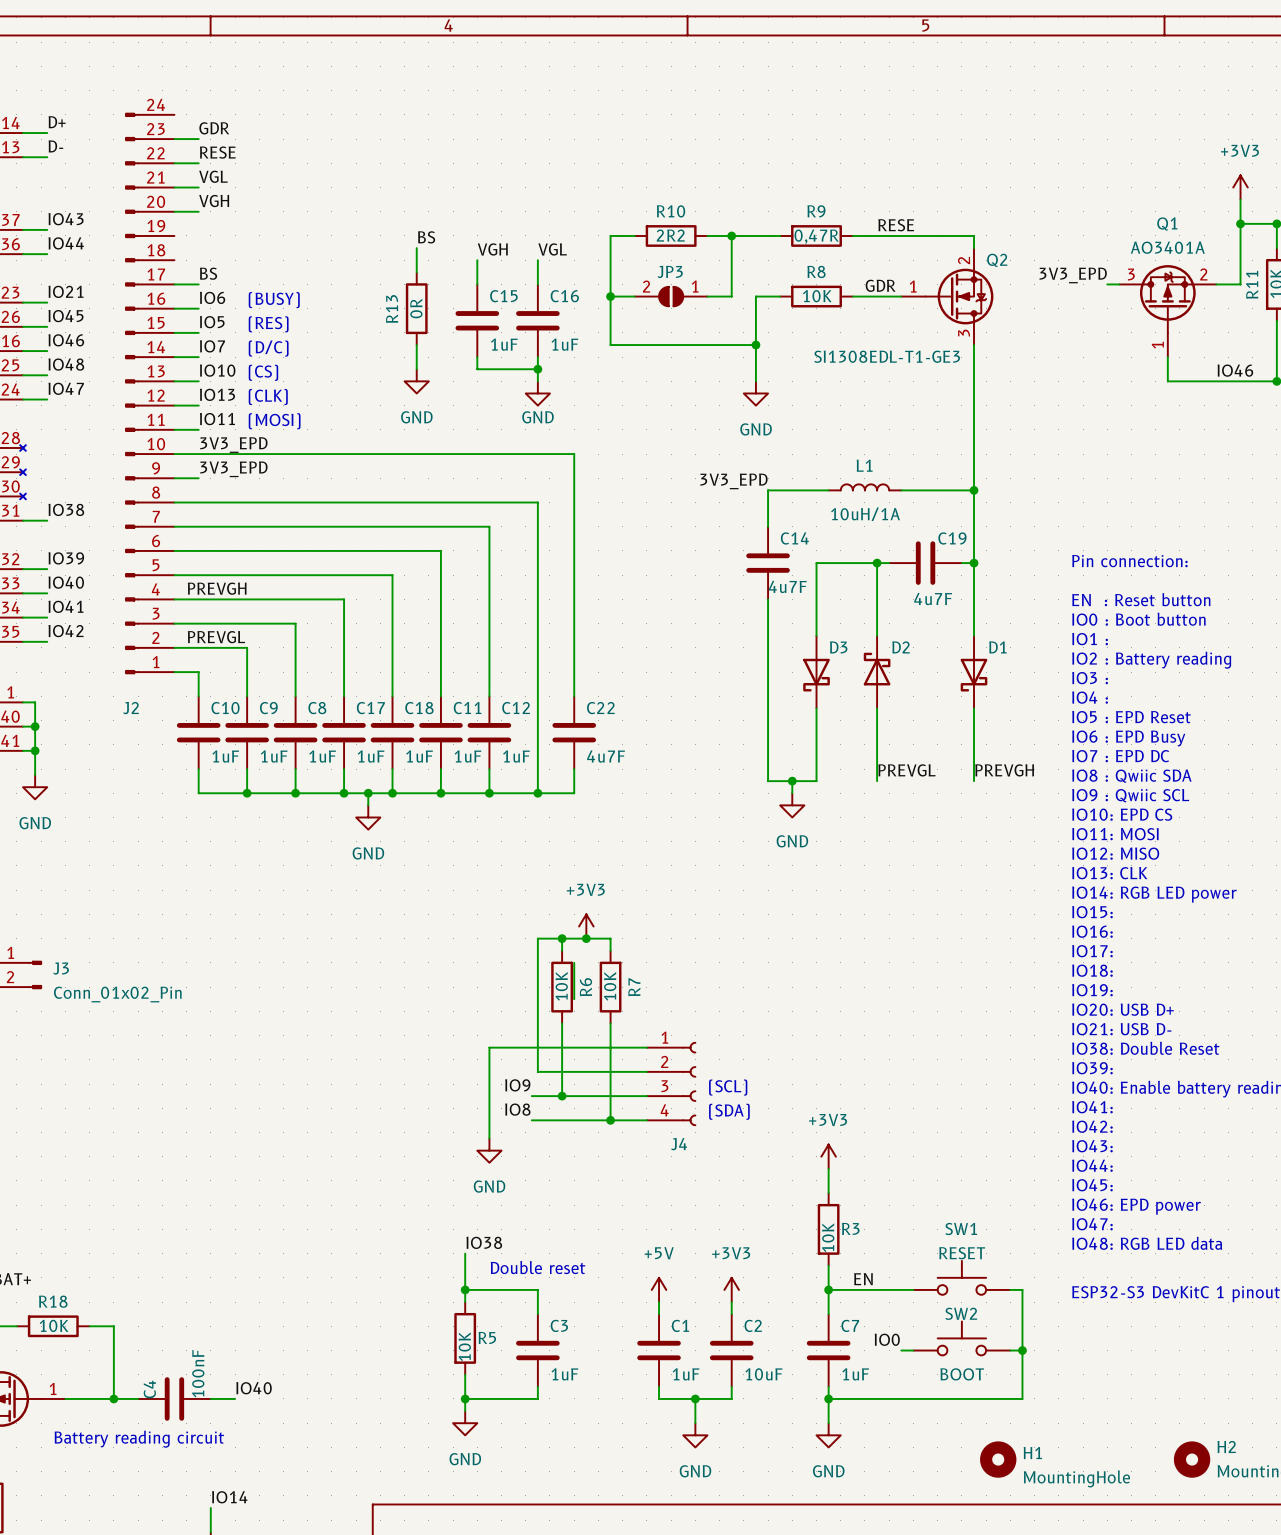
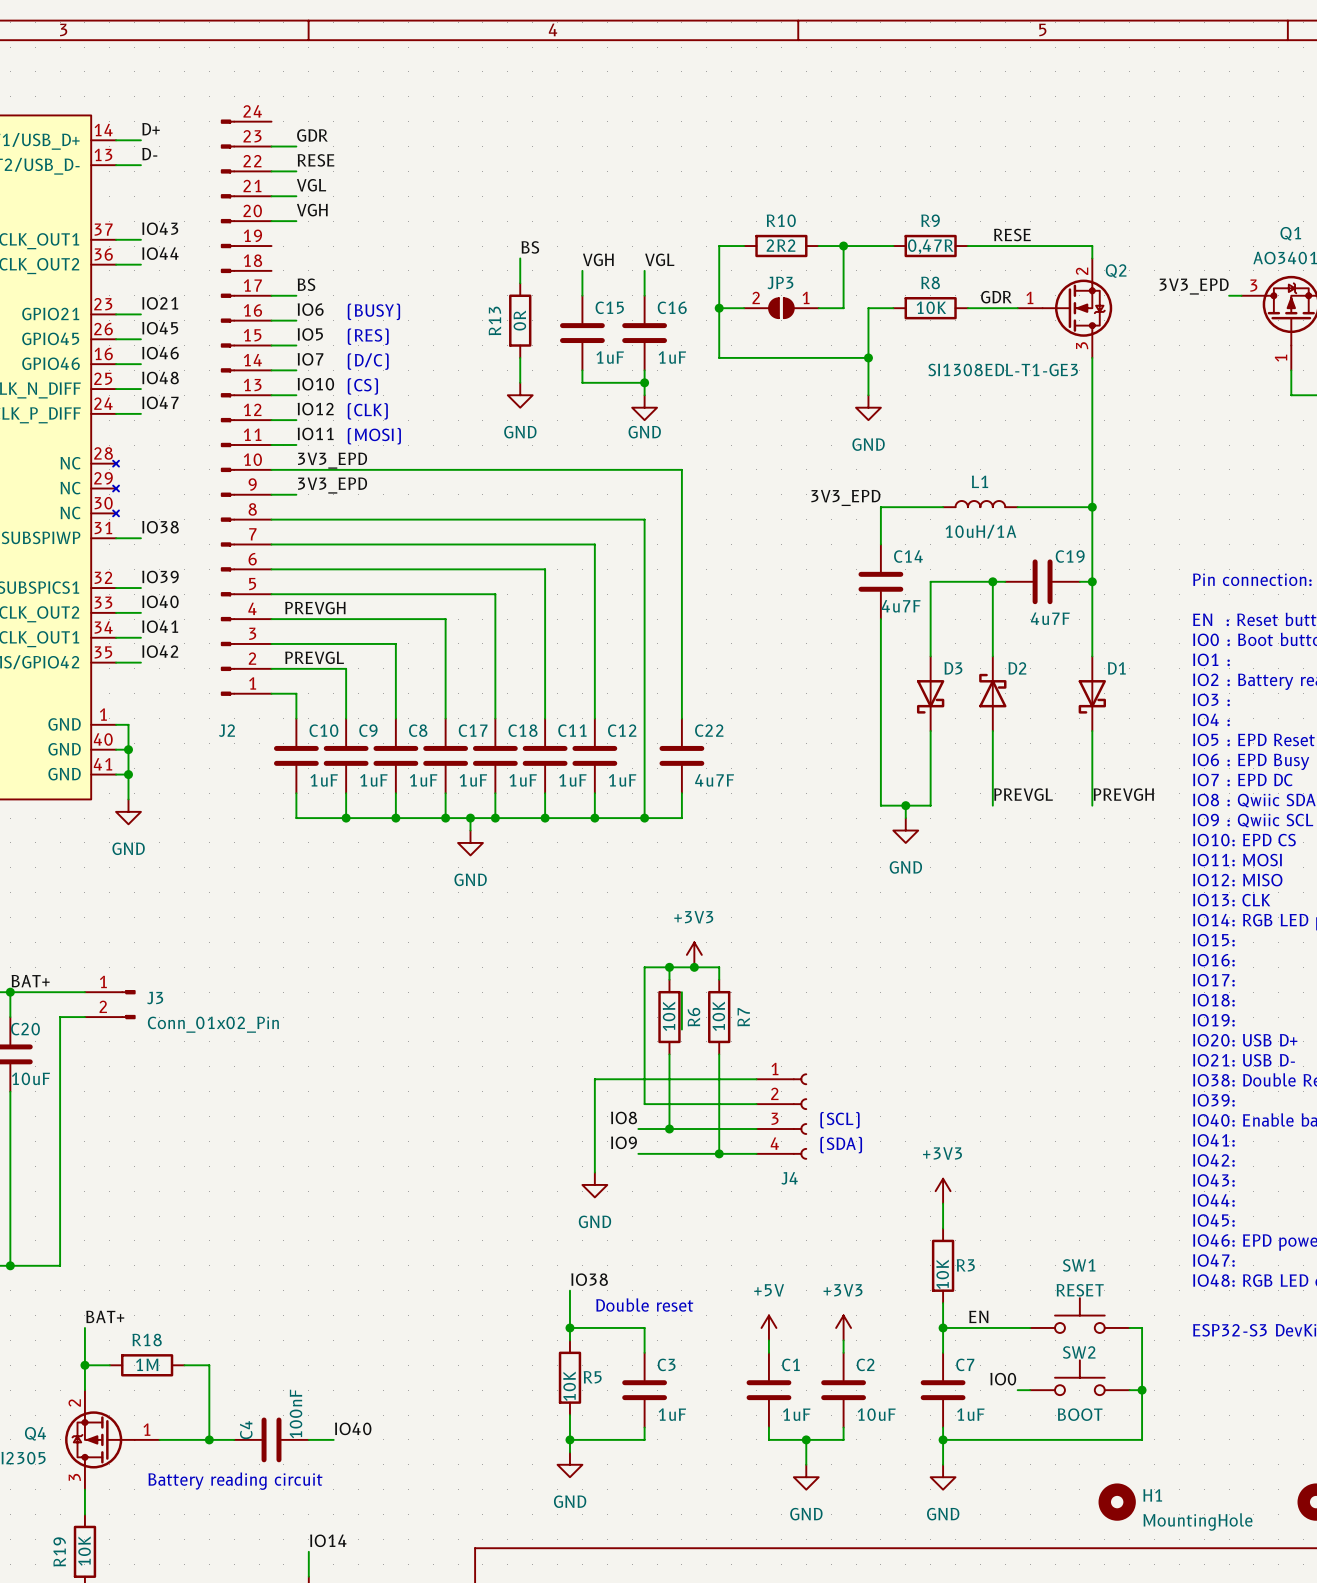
label: IO13 (217, 394) -> IO12 (315, 409)
label: IO9 (517, 1085) -> IO8 (624, 1117)
label: IO8 (517, 1109) -> IO9 (623, 1142)
R18 value: 10K (54, 1325) -> 1M (147, 1364)

